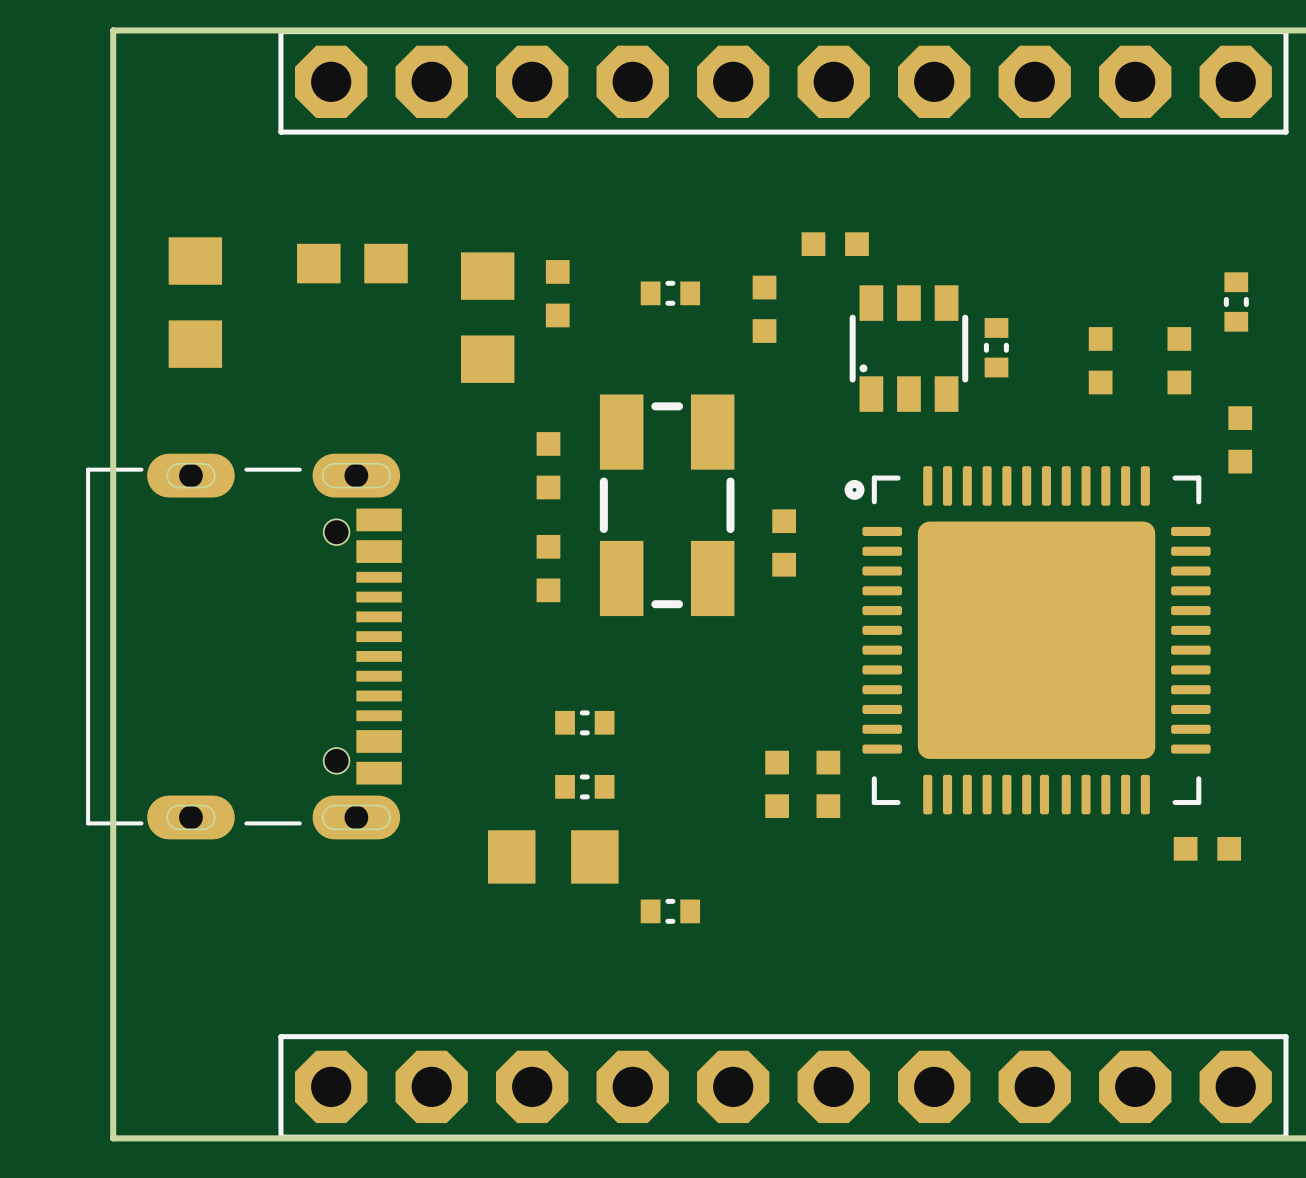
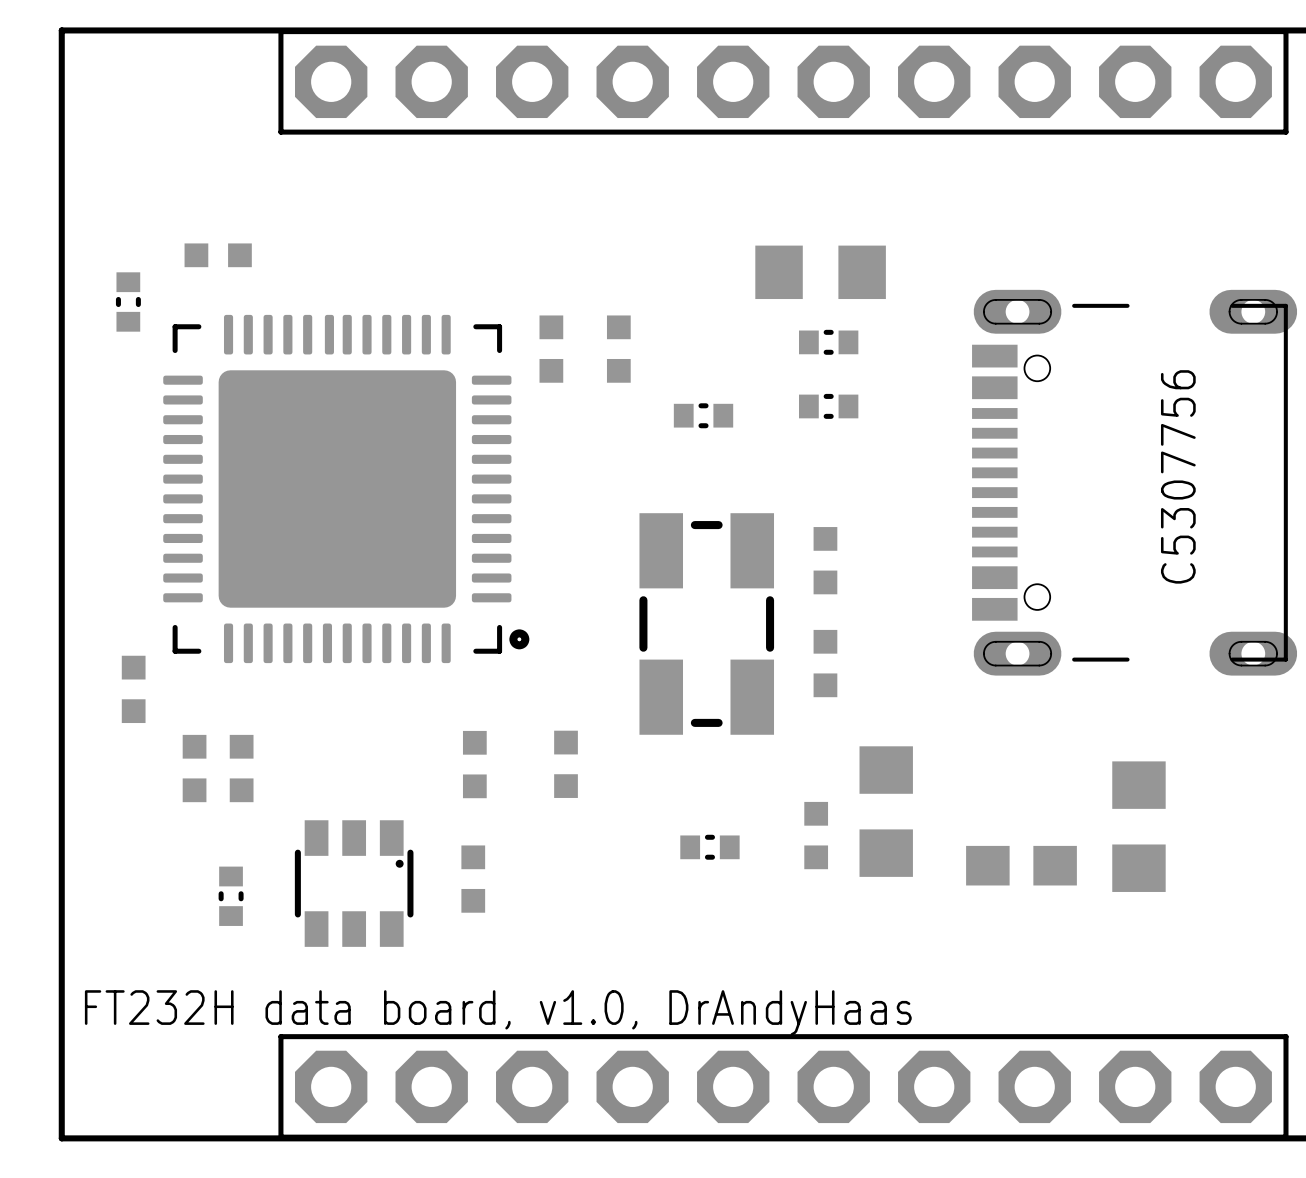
board edge: (113, 30) (113, 1138) -> (113, 30) (61, 30) (61, 1138) (113, 1138)
part footprint: [801, 232, 869, 257] -> [755, 245, 886, 300]
part: none -> (218, 255)
part position: (352, 263) -> (1021, 865)
part: (557, 293) -> none
part: (670, 293) -> none
part: none -> (128, 301)
part: (1236, 301) -> none
part: (195, 302) -> none
part: (764, 309) -> none
part: (487, 317) -> none
part: none -> (828, 342)
part: (996, 347) -> none
part rotation: 0° (908, 348) -> 180° (354, 883)
part position: (908, 348) -> (354, 883)
part: none -> (551, 349)
part: none -> (618, 349)
part: (1100, 360) -> none
part: (1179, 360) -> none
part: none -> (828, 406)
part: none -> (703, 415)
part: (1240, 439) -> none
part: (548, 465) -> none
part: none -> (1134, 482)
part position: (667, 505) -> (706, 623)
part position: (784, 542) -> (825, 560)
part: (548, 568) -> none
part rotation: 0° (1027, 640) -> 180° (346, 488)
part position: (1027, 640) -> (346, 488)
part: (243, 646) -> none
part: none -> (825, 663)
part: none -> (133, 689)
part: (584, 722) -> none
part: none -> (474, 764)
part: none -> (566, 764)
part: none -> (194, 768)
part: none -> (241, 768)
part: (777, 784) -> none
part: (828, 784) -> none
part: (584, 786) -> none
part: none -> (886, 811)
part: none -> (1138, 826)
part: none -> (816, 835)
part: none -> (709, 847)
part: (1207, 848) -> none
part: (553, 856) -> none
part: none -> (473, 879)
part: none -> (231, 896)
part: (670, 911) -> none
text: none -> FT232H data board, v1.0, DrAndyHaas (498, 1012)

